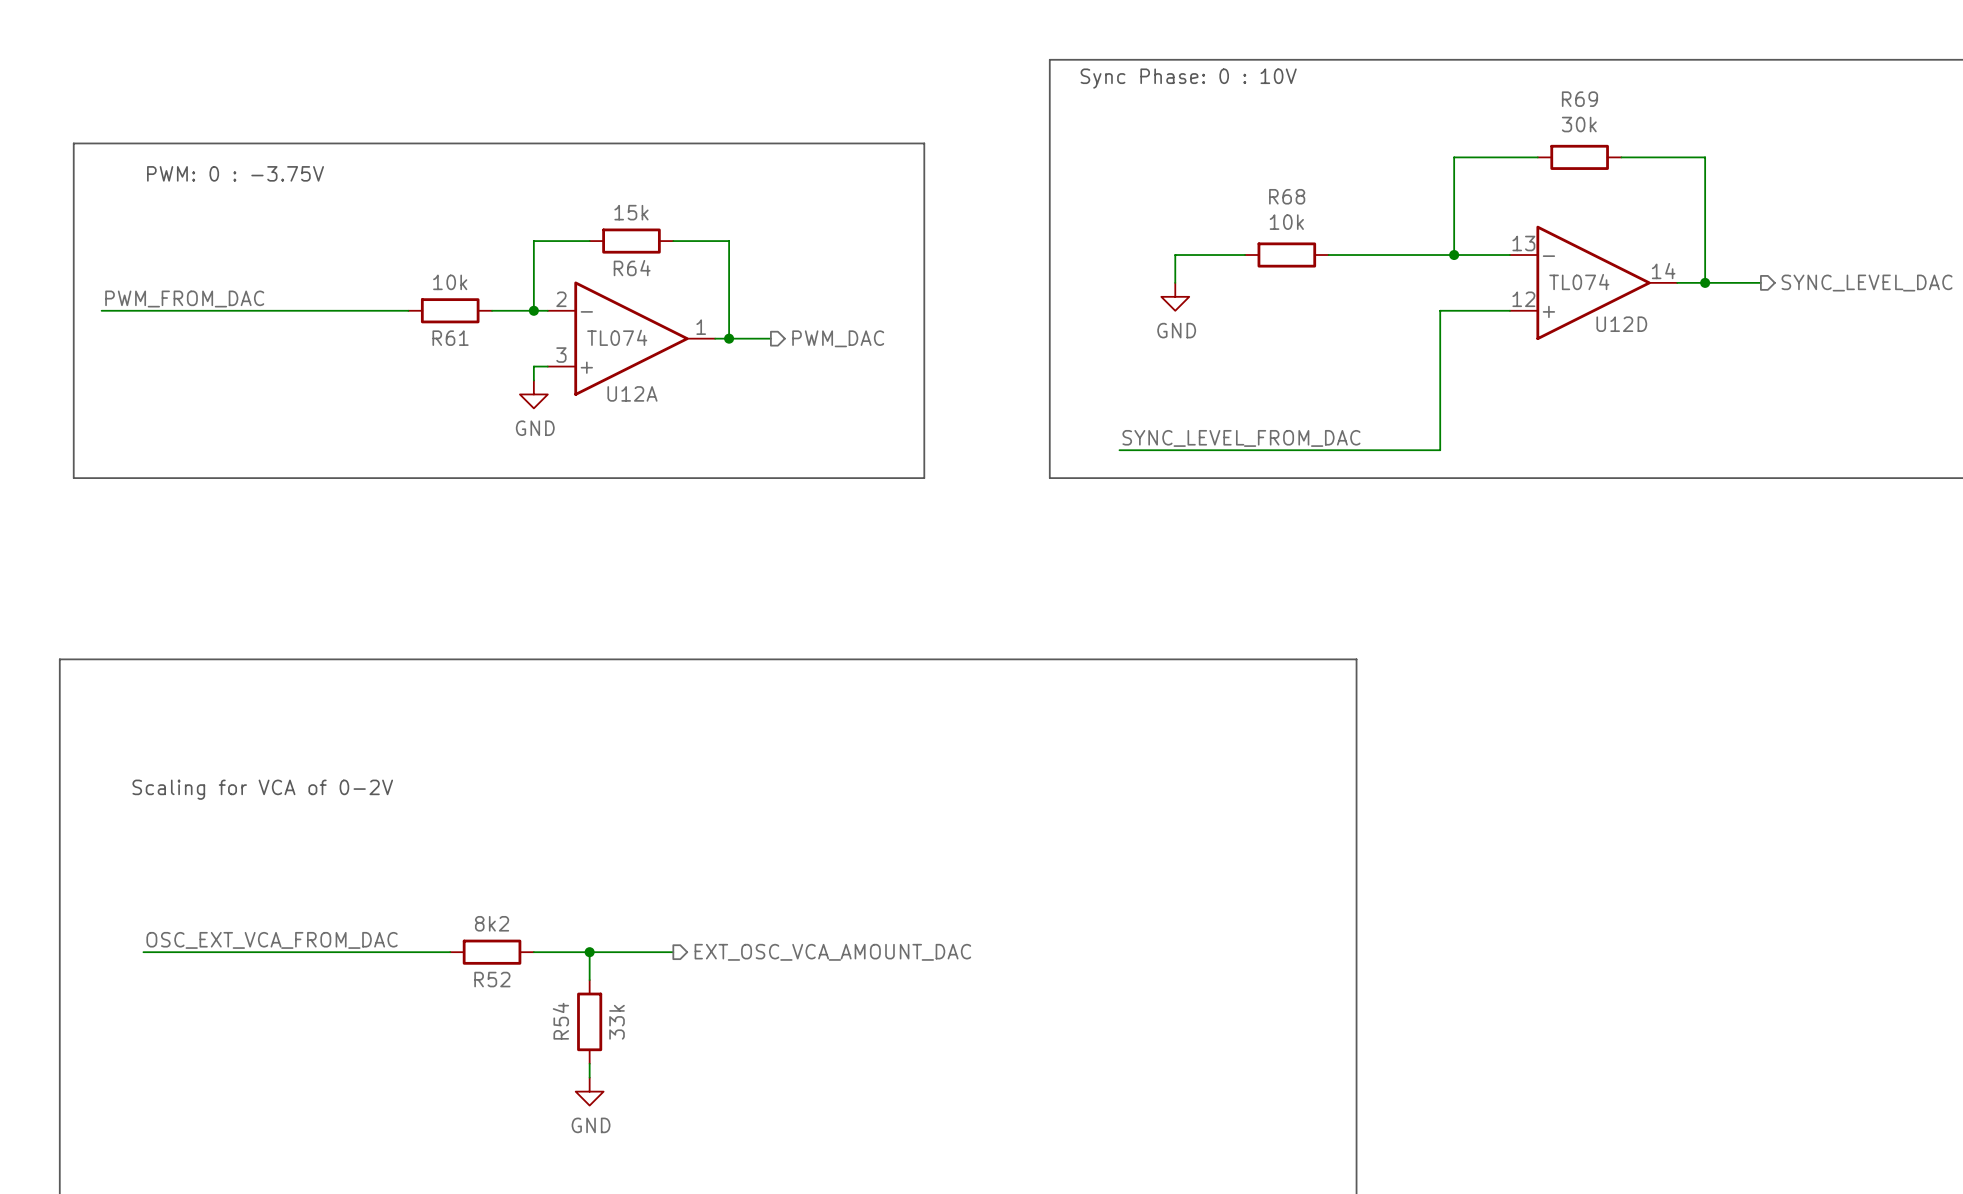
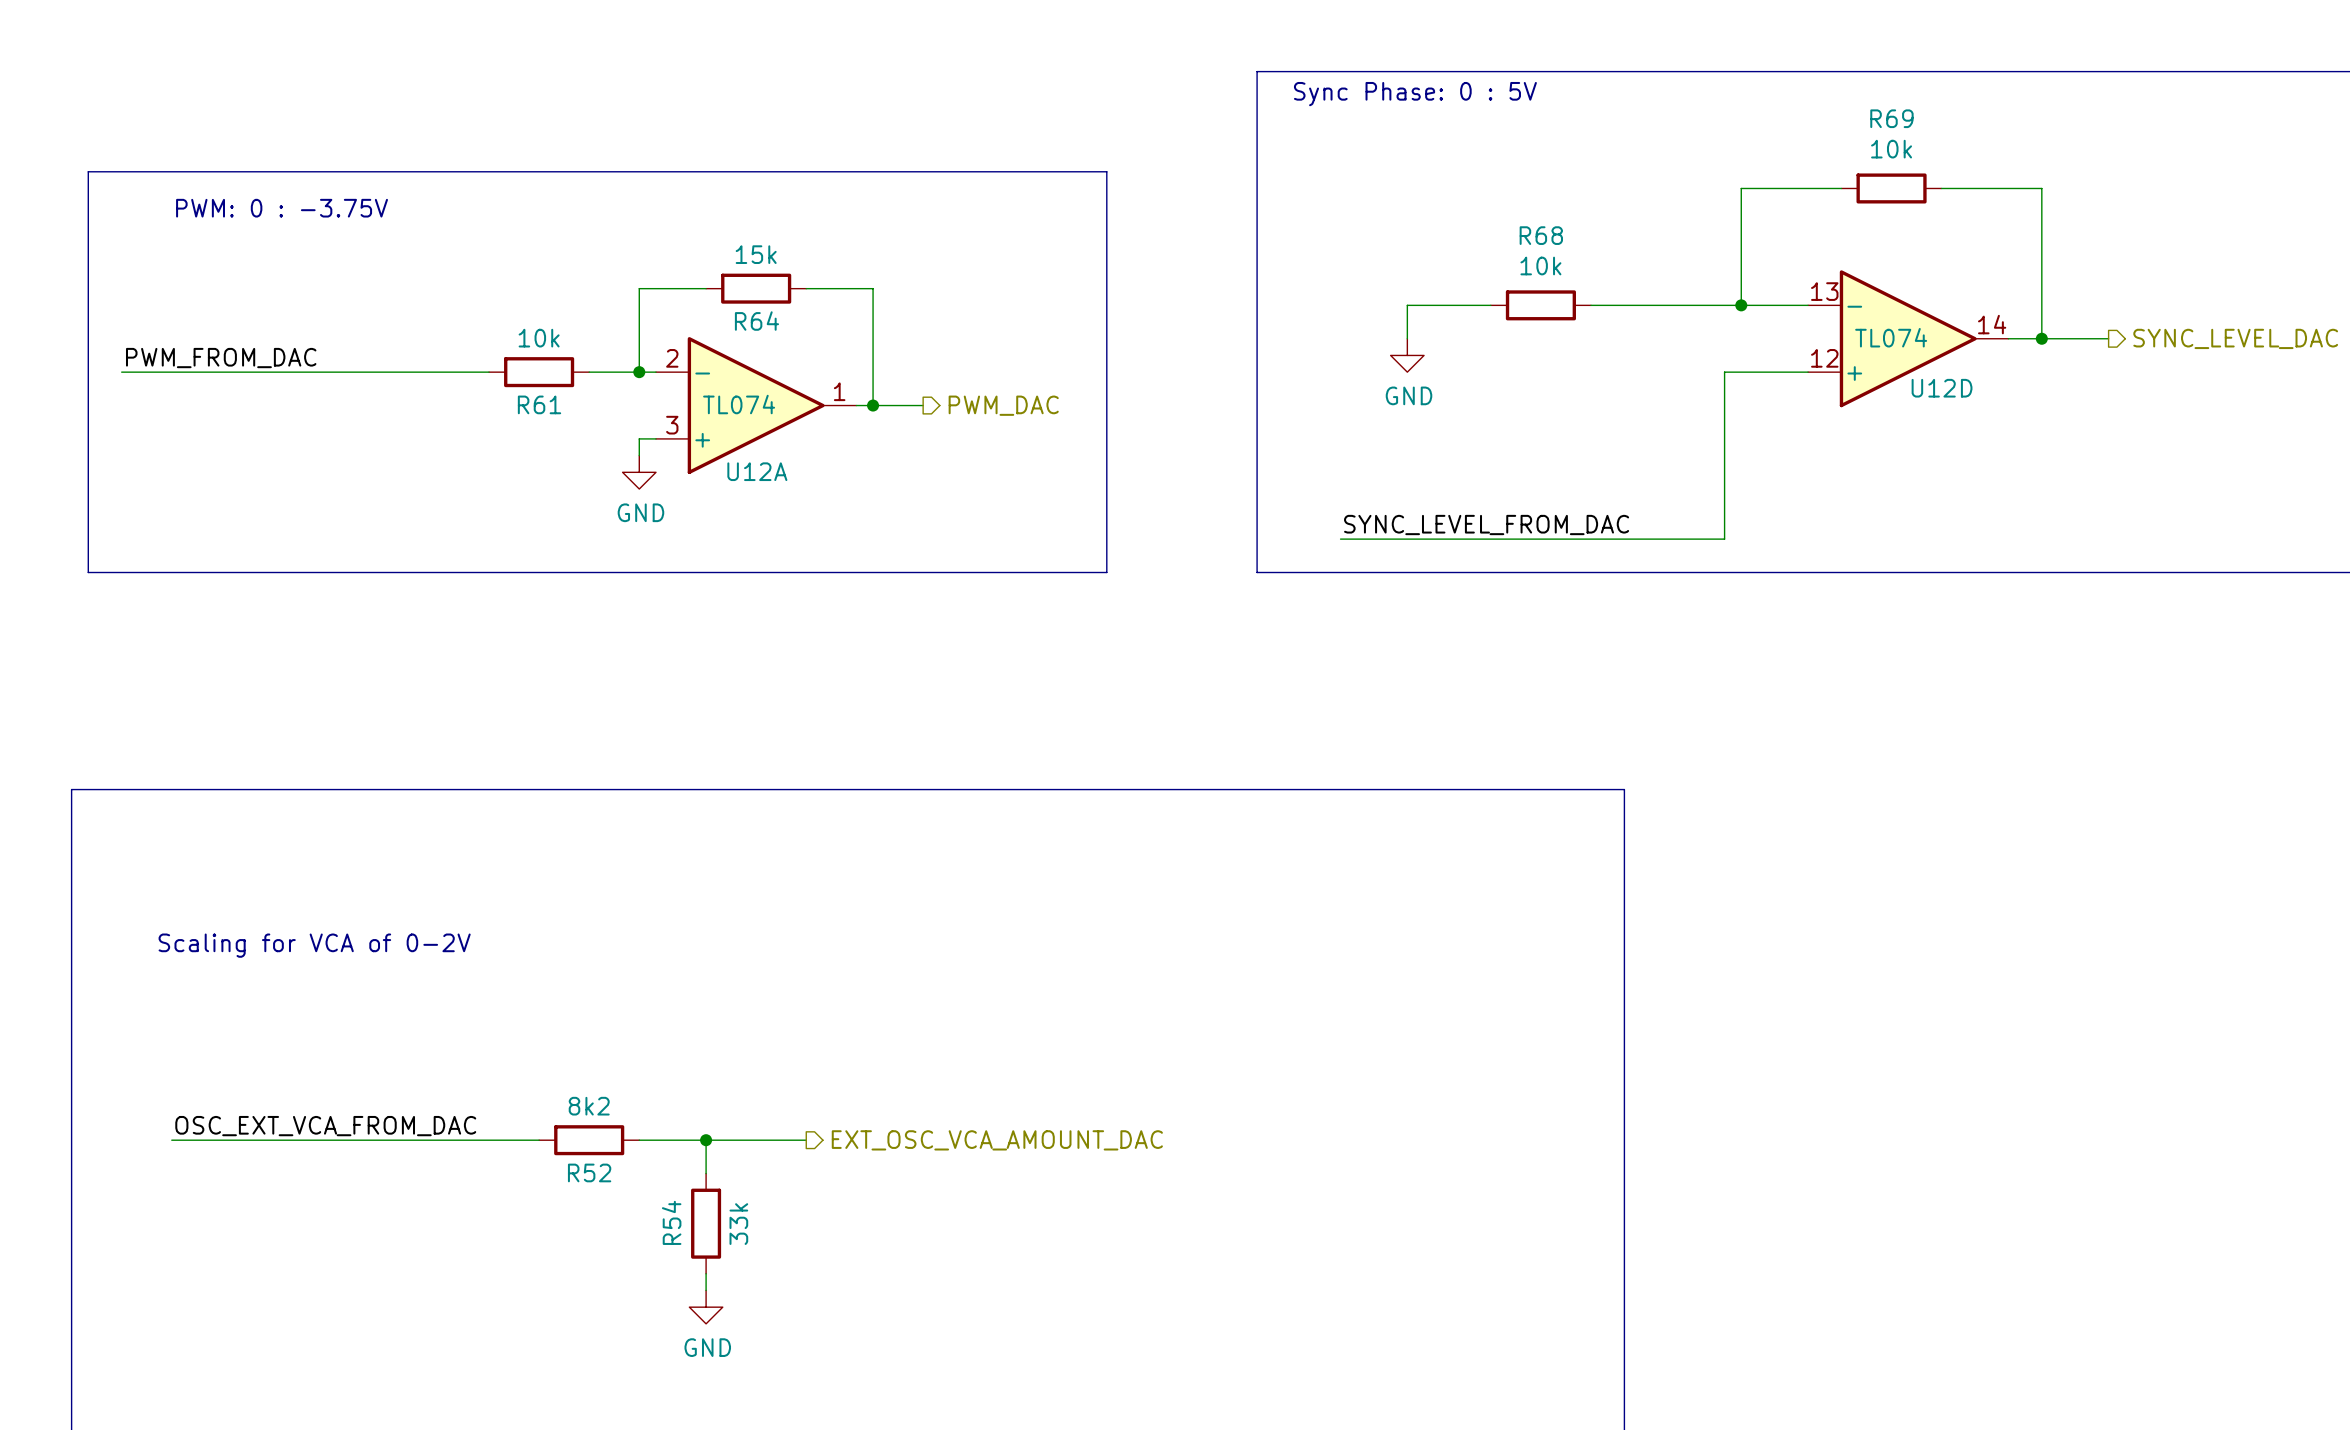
text: Sync Phase: 0 : 10V (1188, 78) -> Sync Phase: 0 : 5V (1415, 94)
R69 value: 30k (1579, 124) -> 10k (1891, 149)

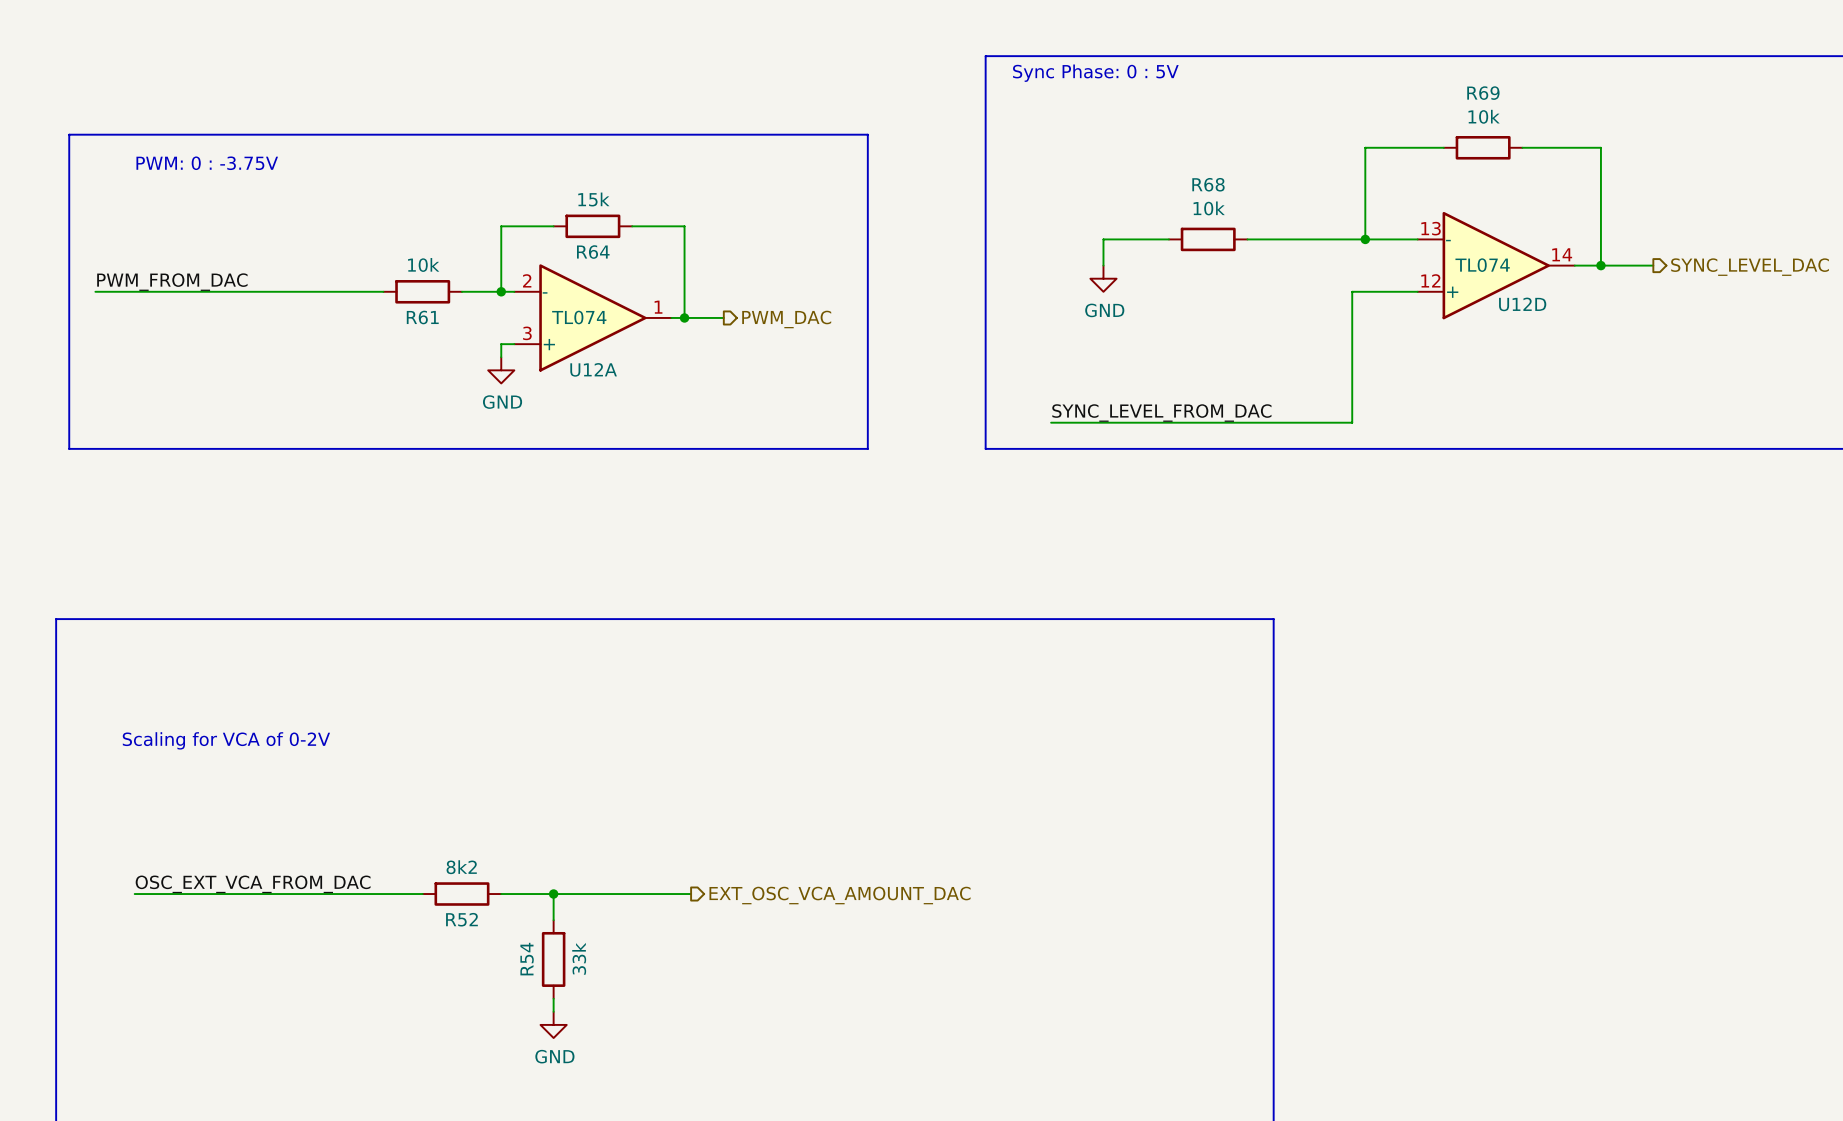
wire: none -> (632, 894) (691, 894)
hierarchical label position: EXT_OSC_VCA_AMOUNT_DAC (997, 1140) -> EXT_OSC_VCA_AMOUNT_DAC (840, 895)

